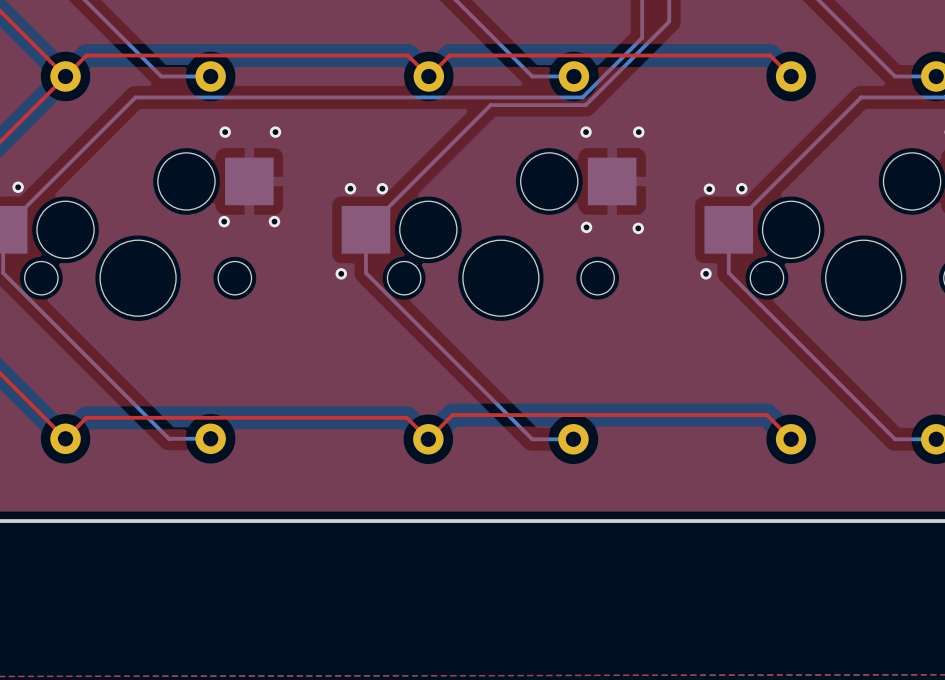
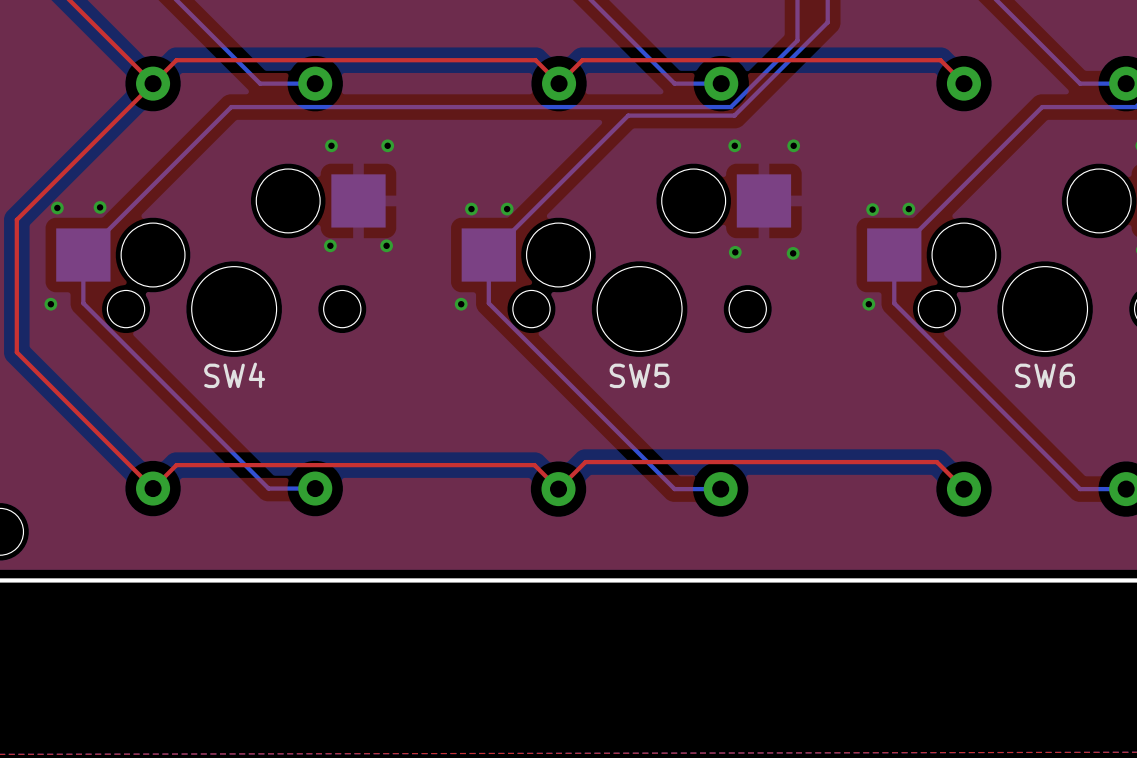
SW4 name: none -> SW4 (234, 375)
SW5 name: none -> SW5 (639, 375)
SW6 name: none -> SW6 (1045, 375)

